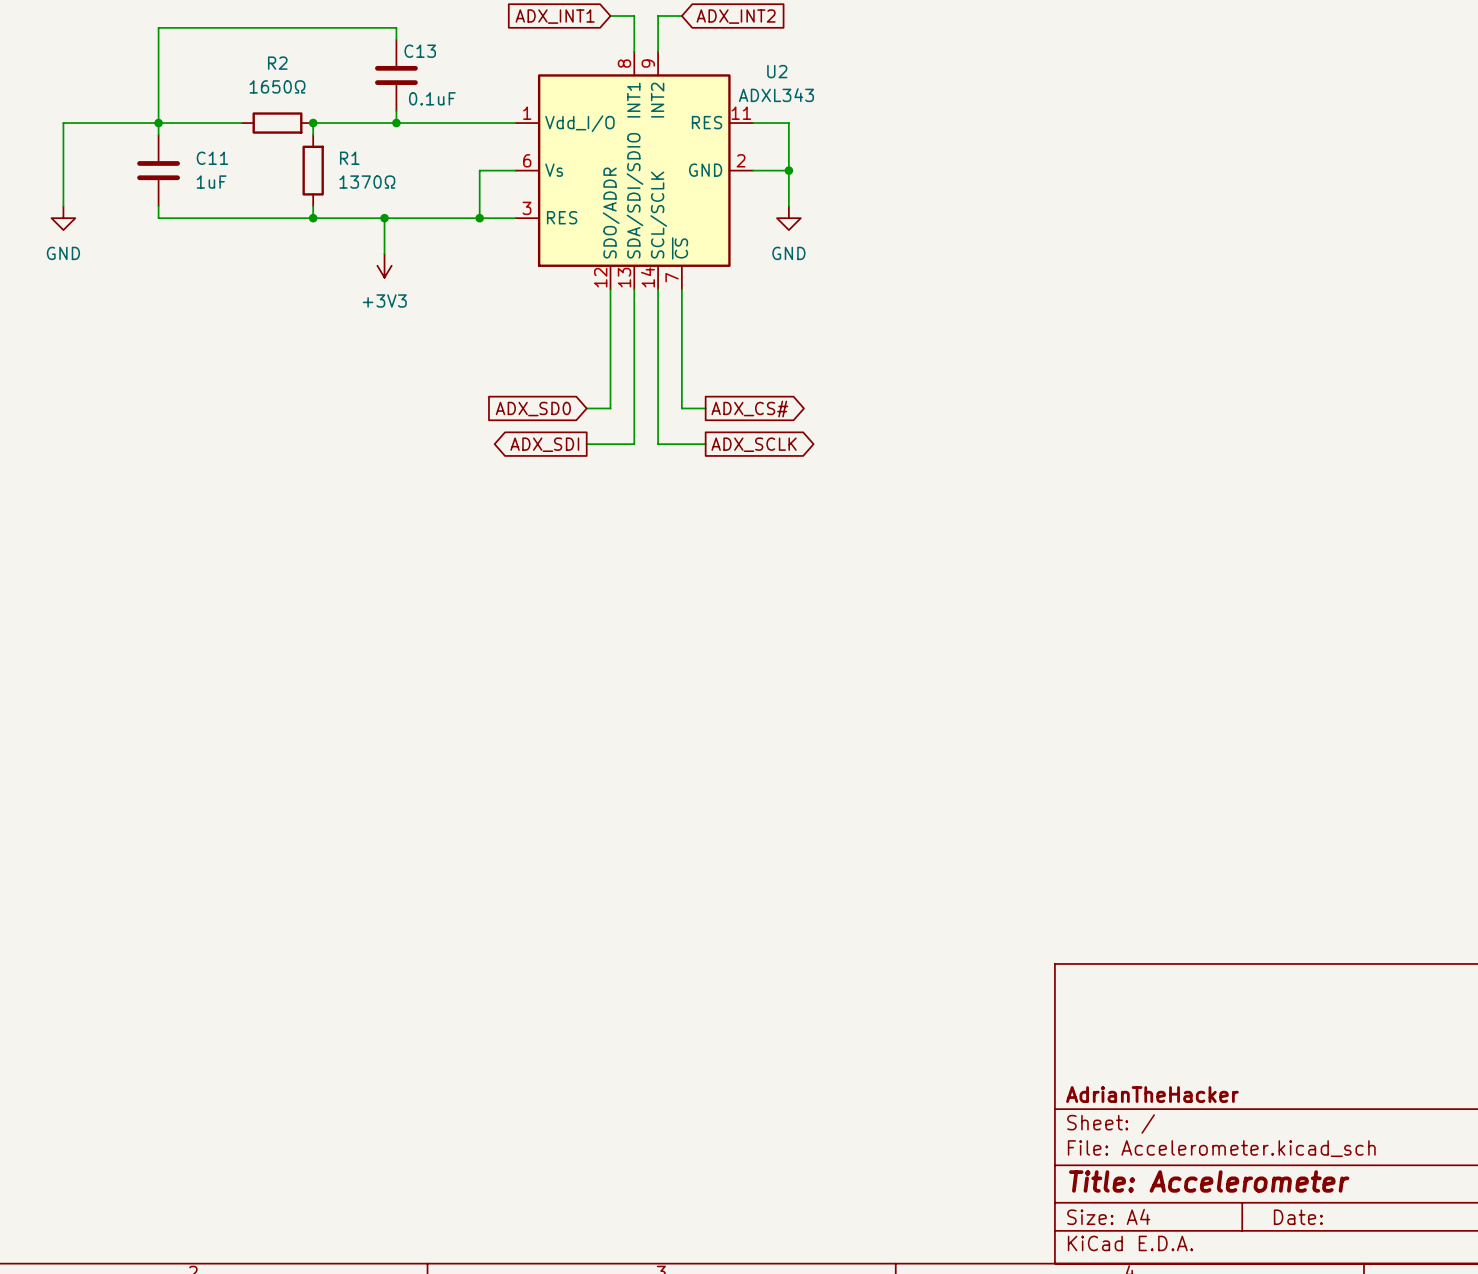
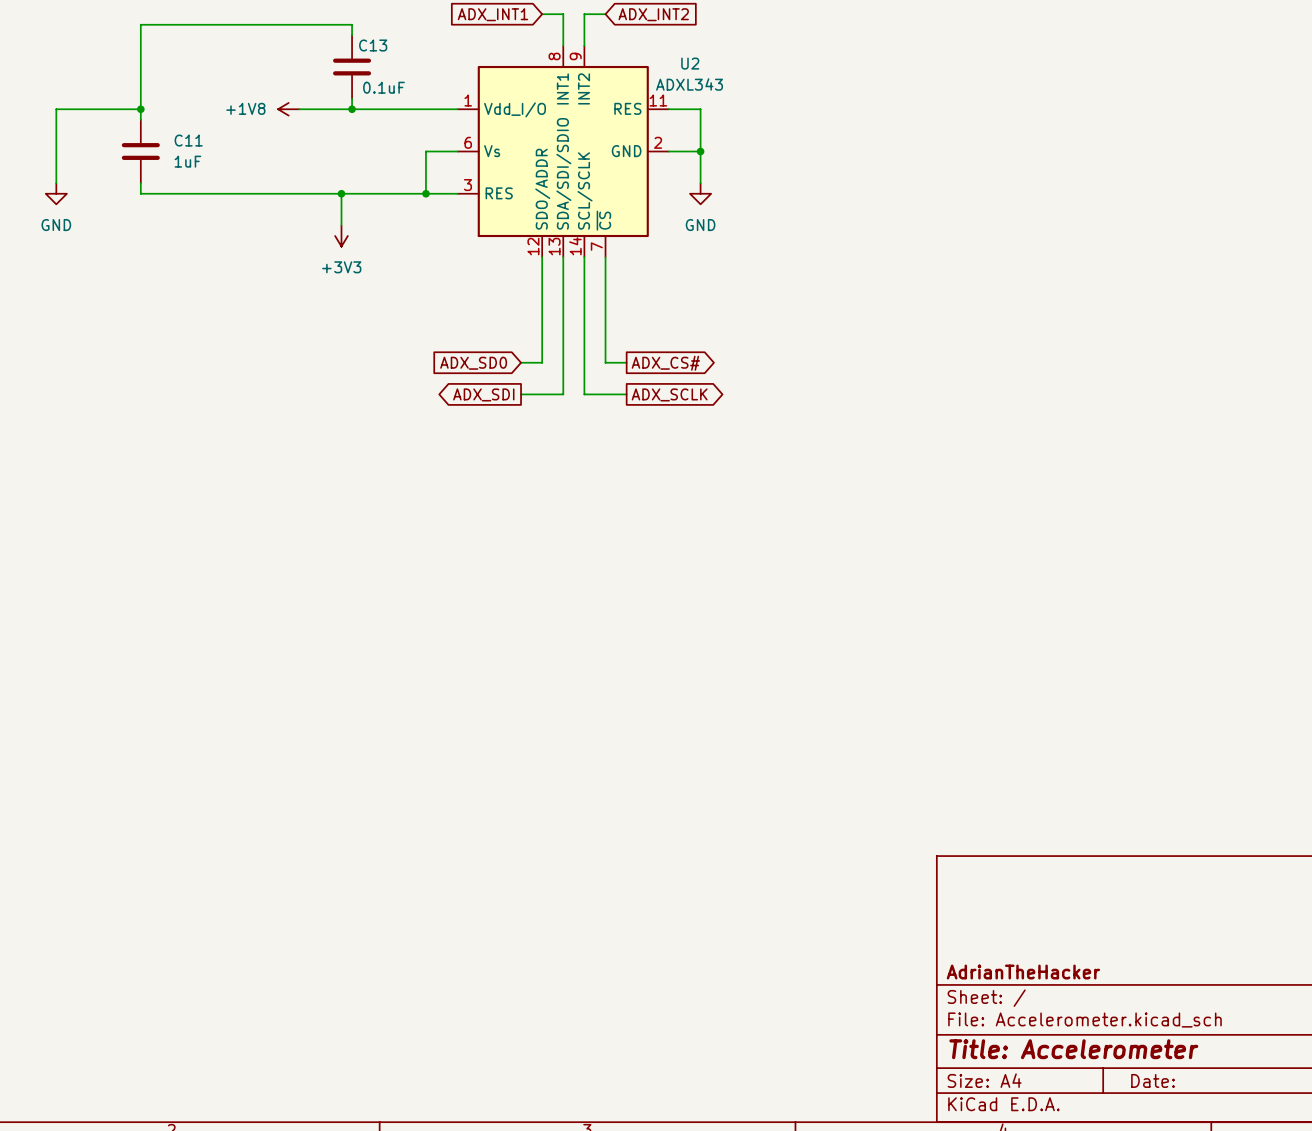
wire: (158, 123) (241, 123) -> none
R2: 1650Ω (277, 123) -> none
junction: (313, 123) -> none
power symbol: none -> +1V8 (288, 109)
R1: 1370Ω (313, 170) -> none
wire: (313, 206) (313, 218) -> none
junction: (313, 218) -> none

